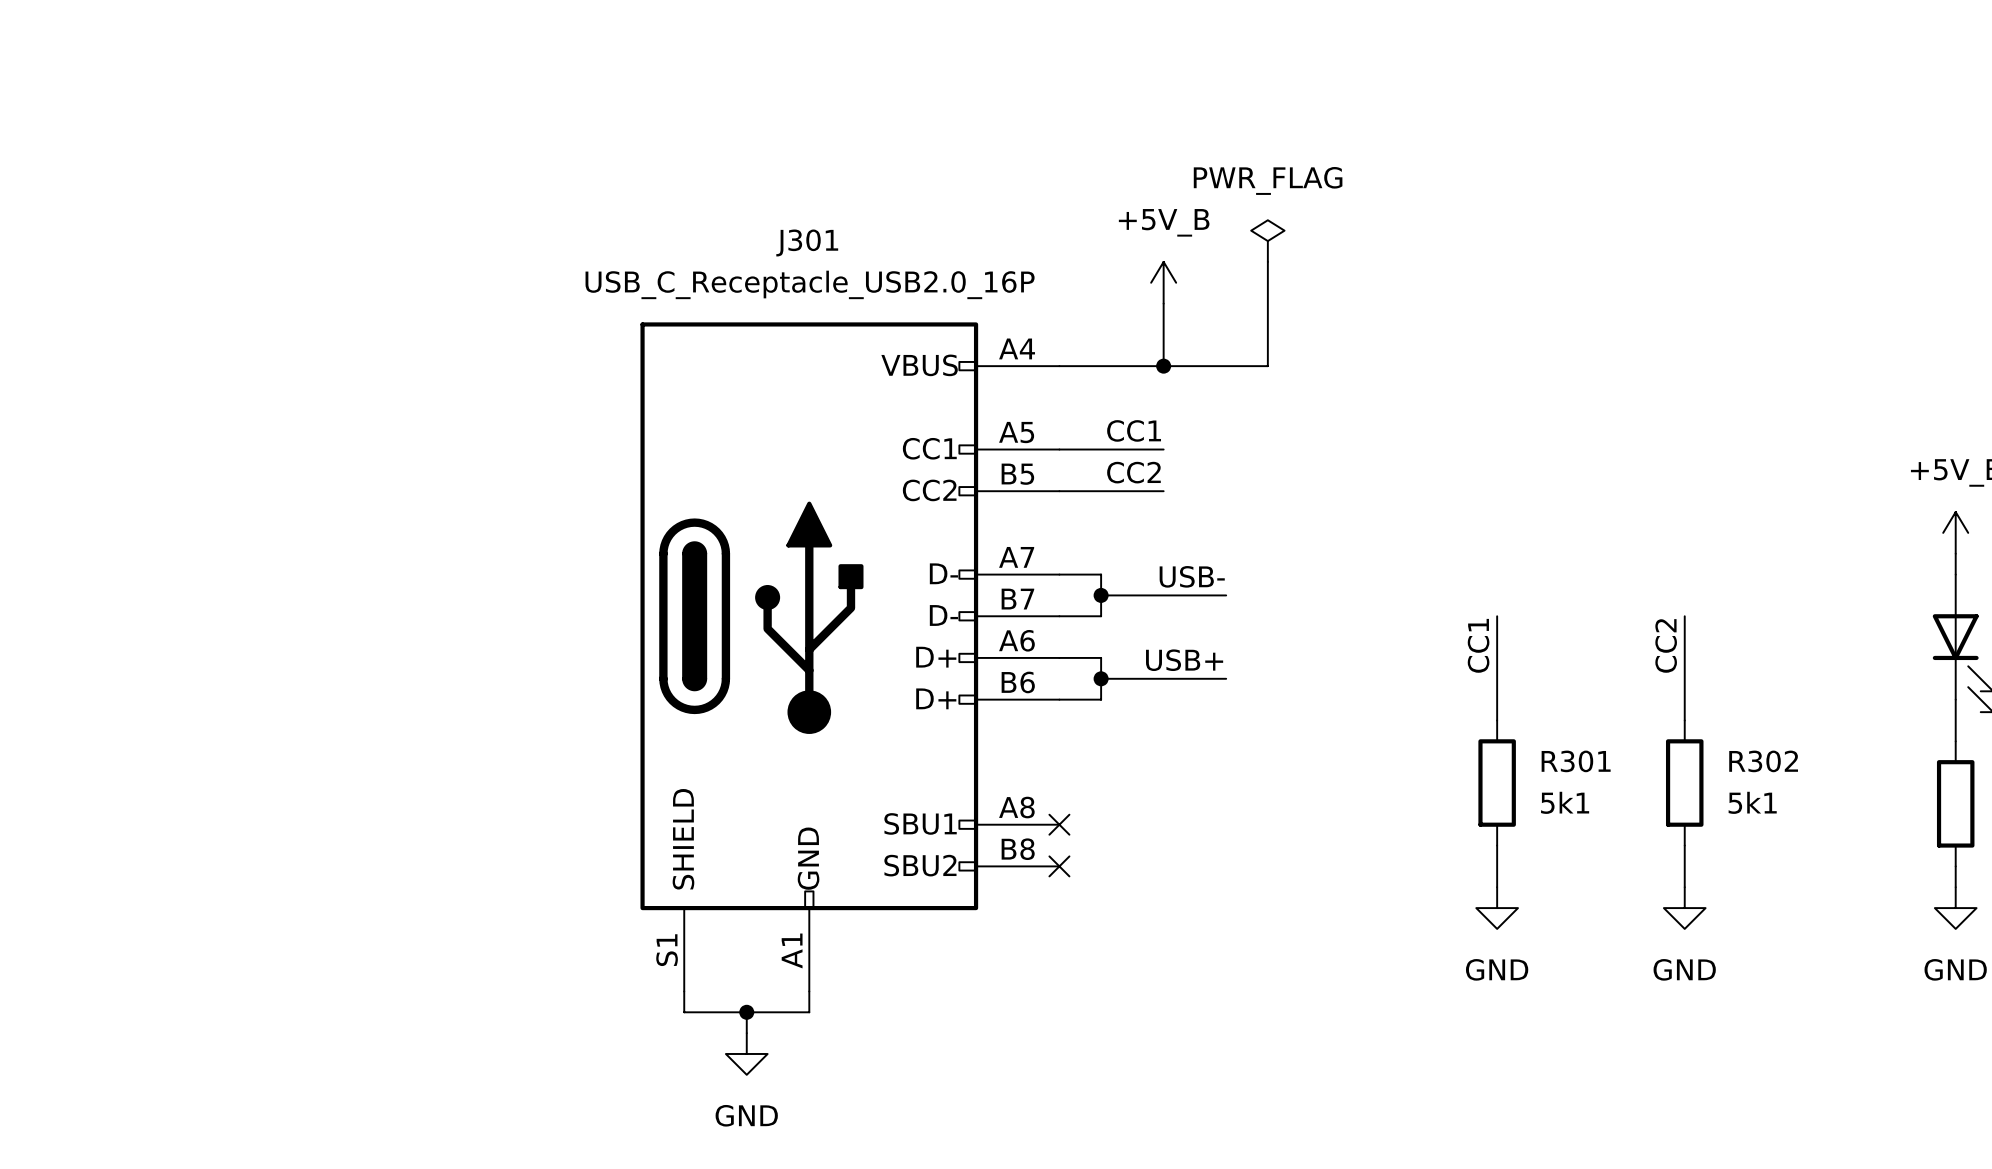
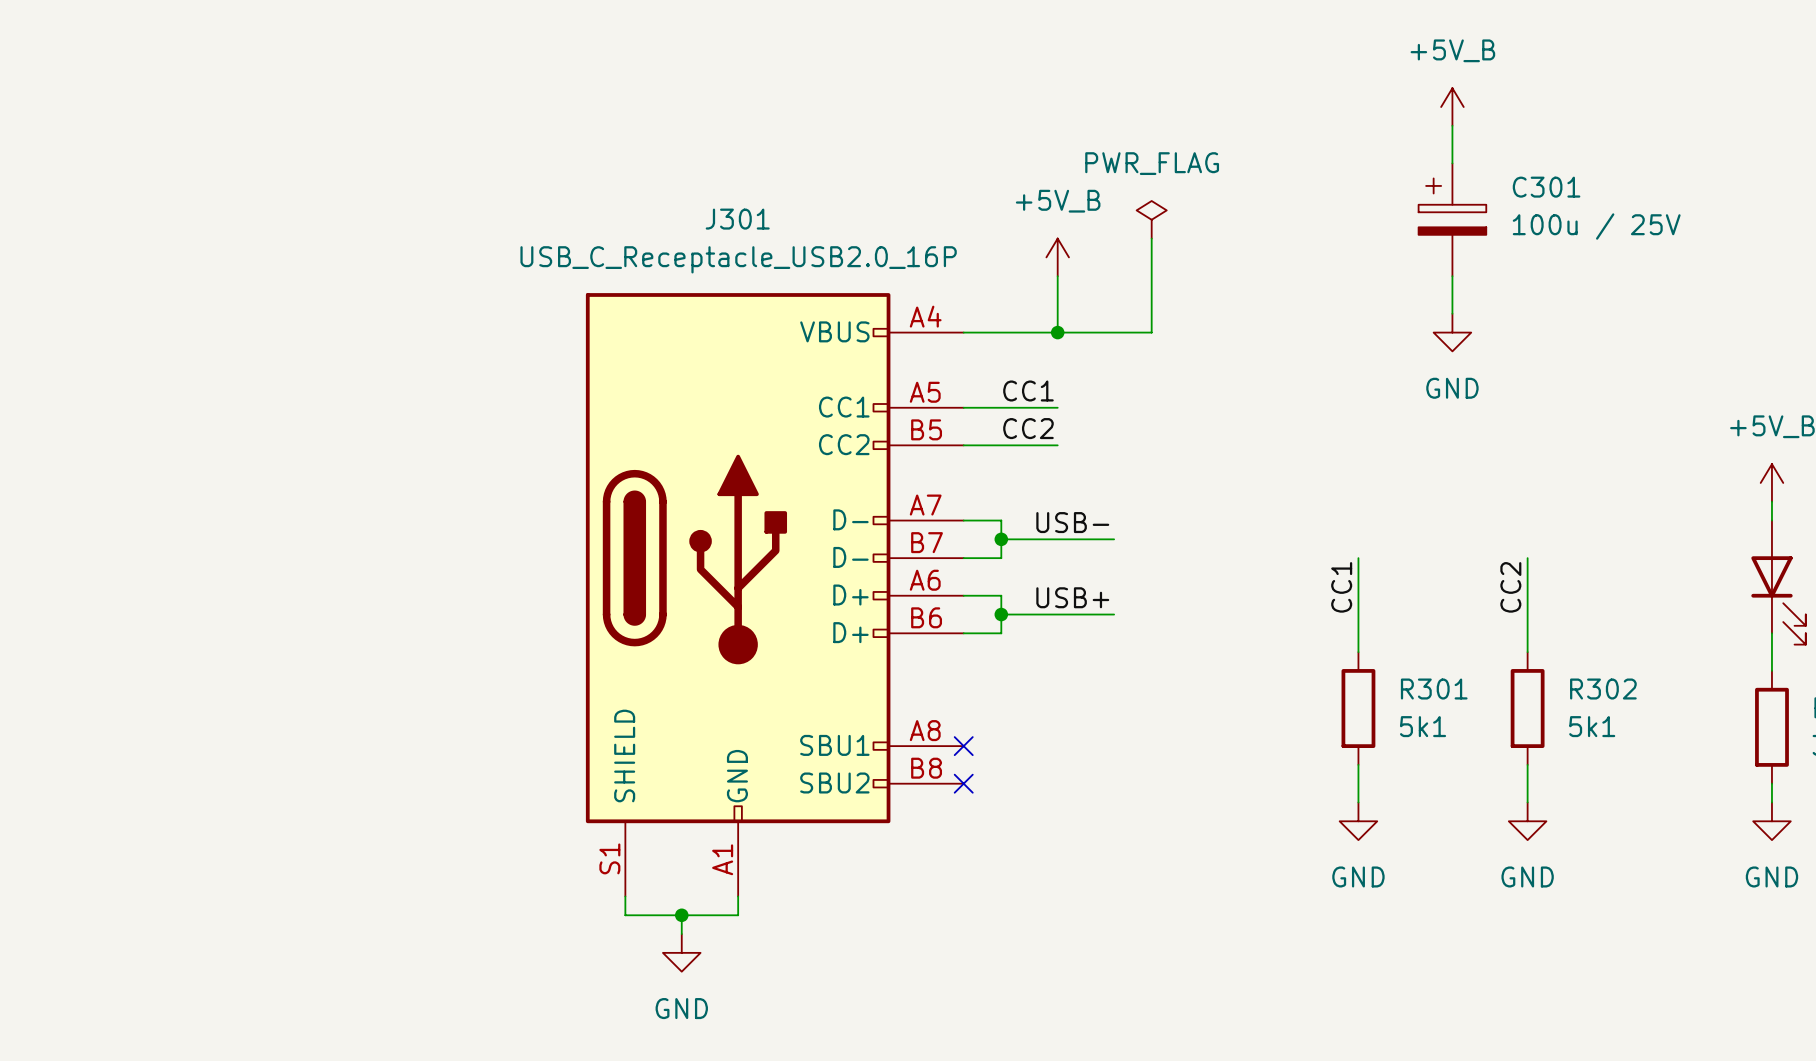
power symbol: none -> +5V_B (1452, 107)
wire: none -> (1452, 125) (1452, 163)
C301: none -> 100u / 25V (1452, 219)
wire: none -> (1452, 276) (1452, 313)
power symbol: none -> GND (1452, 332)

